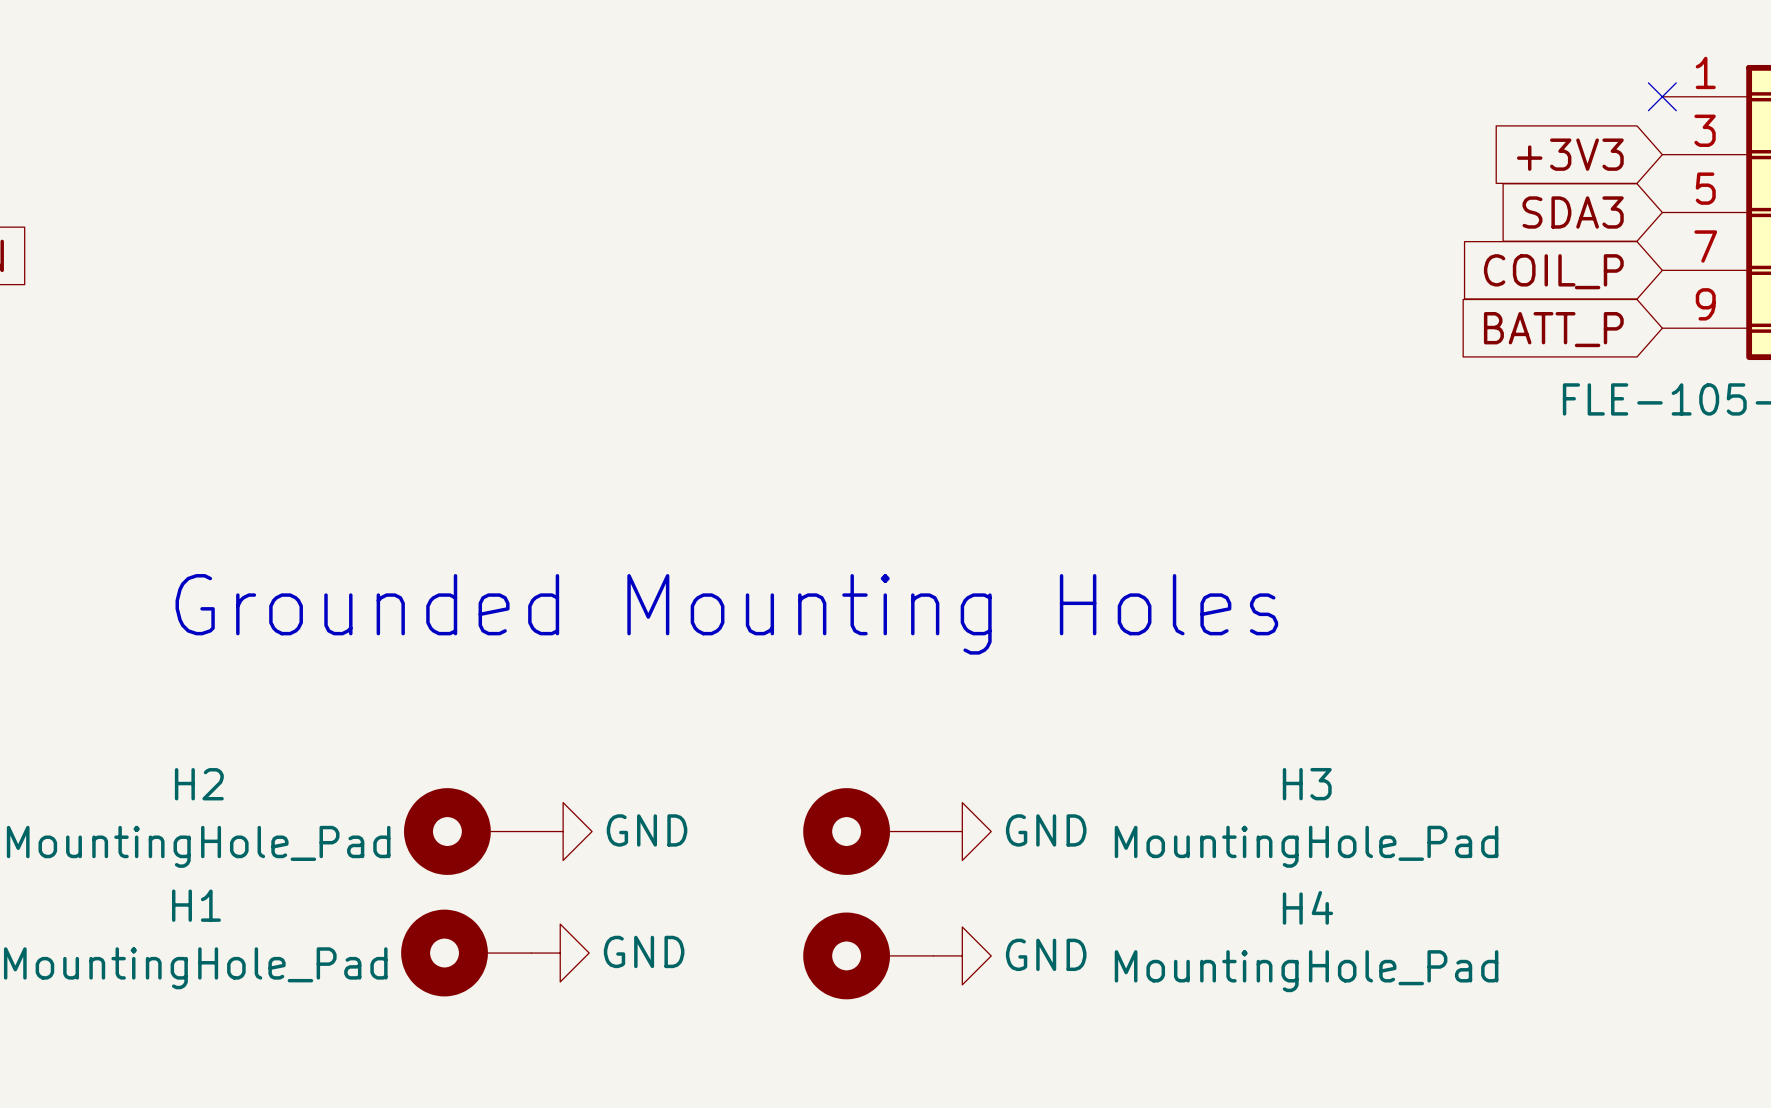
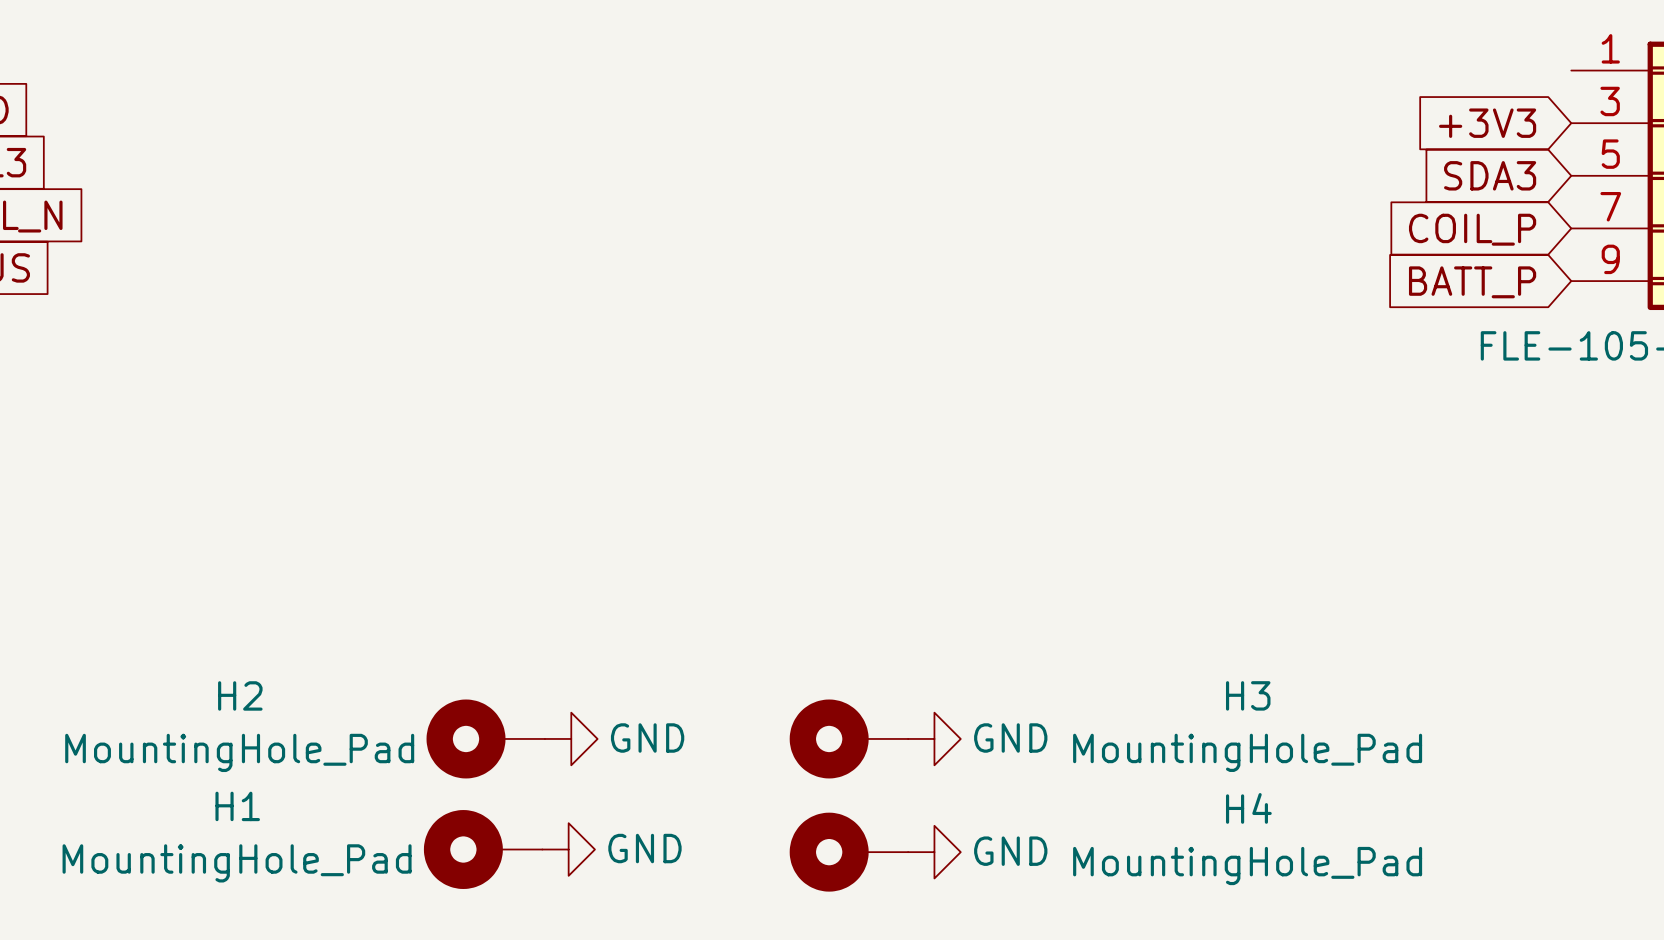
no-connect mark: (1662, 96) -> none
text: Grounded Mounting Holes (726, 614) -> none

